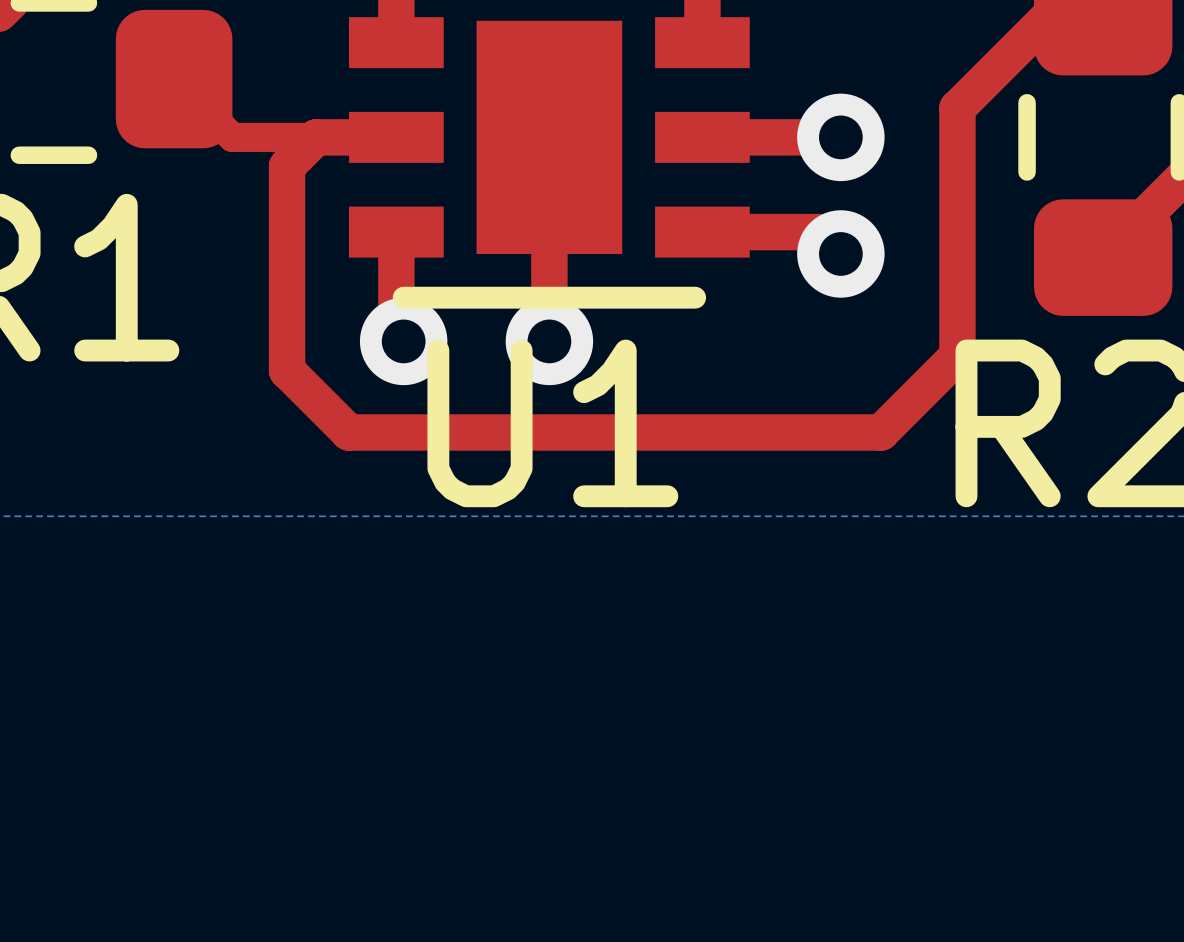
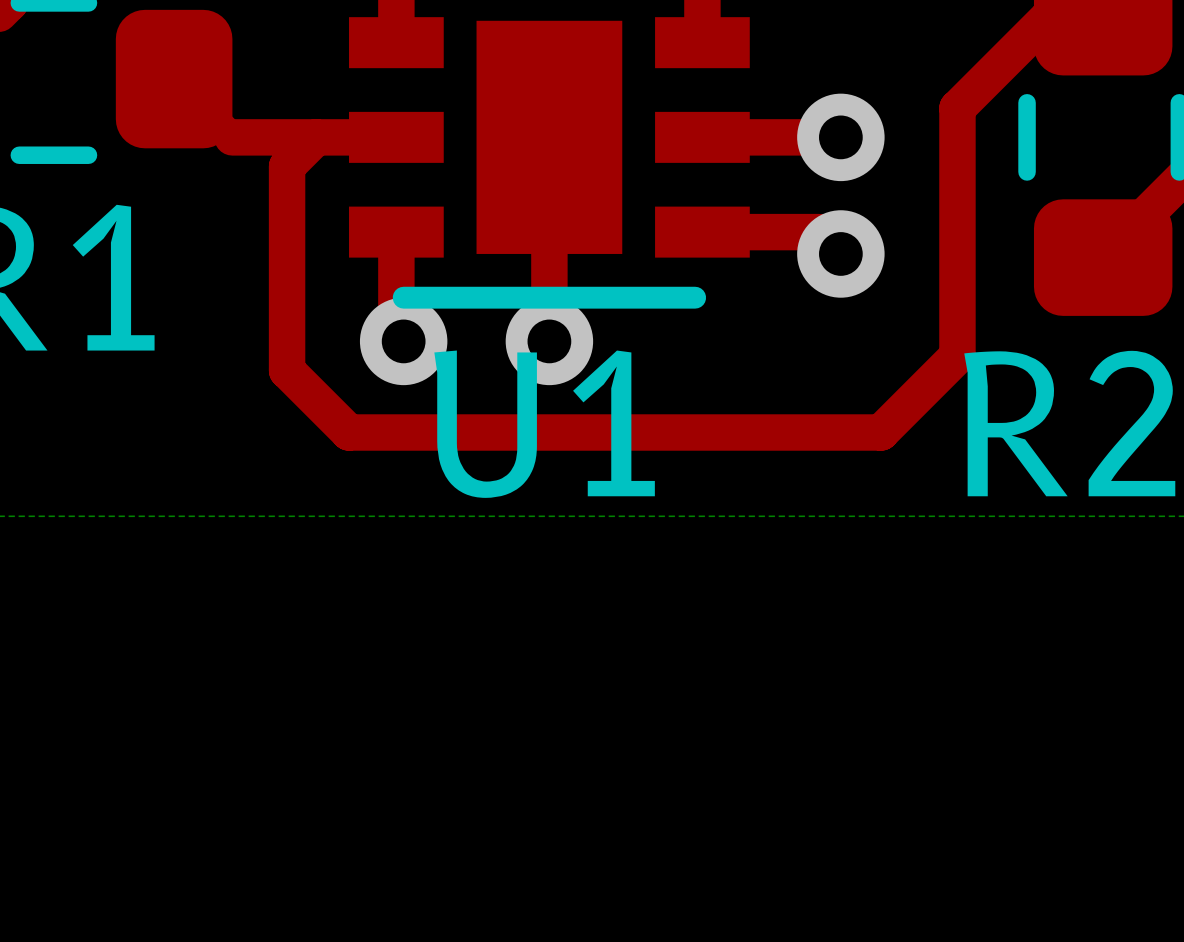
top track width: thin (232, 137) (316, 137) -> thick (232, 137) (316, 137)

